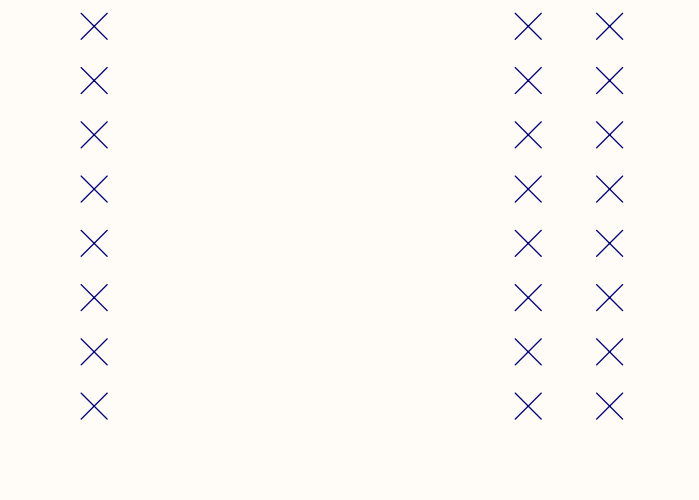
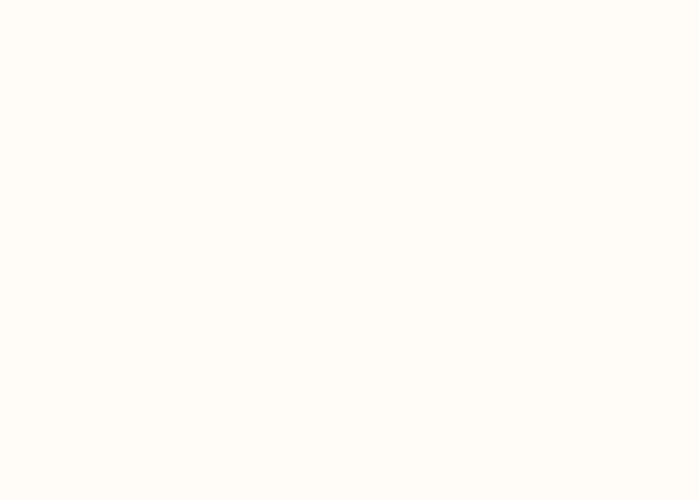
no-connect mark: (94, 26) -> none
no-connect mark: (528, 26) -> none
no-connect mark: (609, 26) -> none
no-connect mark: (94, 80) -> none
no-connect mark: (528, 80) -> none
no-connect mark: (609, 80) -> none
no-connect mark: (94, 134) -> none
no-connect mark: (528, 134) -> none
no-connect mark: (609, 134) -> none
no-connect mark: (94, 189) -> none
no-connect mark: (528, 189) -> none
no-connect mark: (609, 189) -> none
no-connect mark: (94, 243) -> none
no-connect mark: (528, 243) -> none
no-connect mark: (609, 243) -> none
no-connect mark: (94, 297) -> none
no-connect mark: (528, 297) -> none
no-connect mark: (609, 297) -> none
no-connect mark: (94, 351) -> none
no-connect mark: (528, 351) -> none
no-connect mark: (609, 351) -> none
no-connect mark: (94, 406) -> none
no-connect mark: (528, 406) -> none
no-connect mark: (609, 406) -> none

